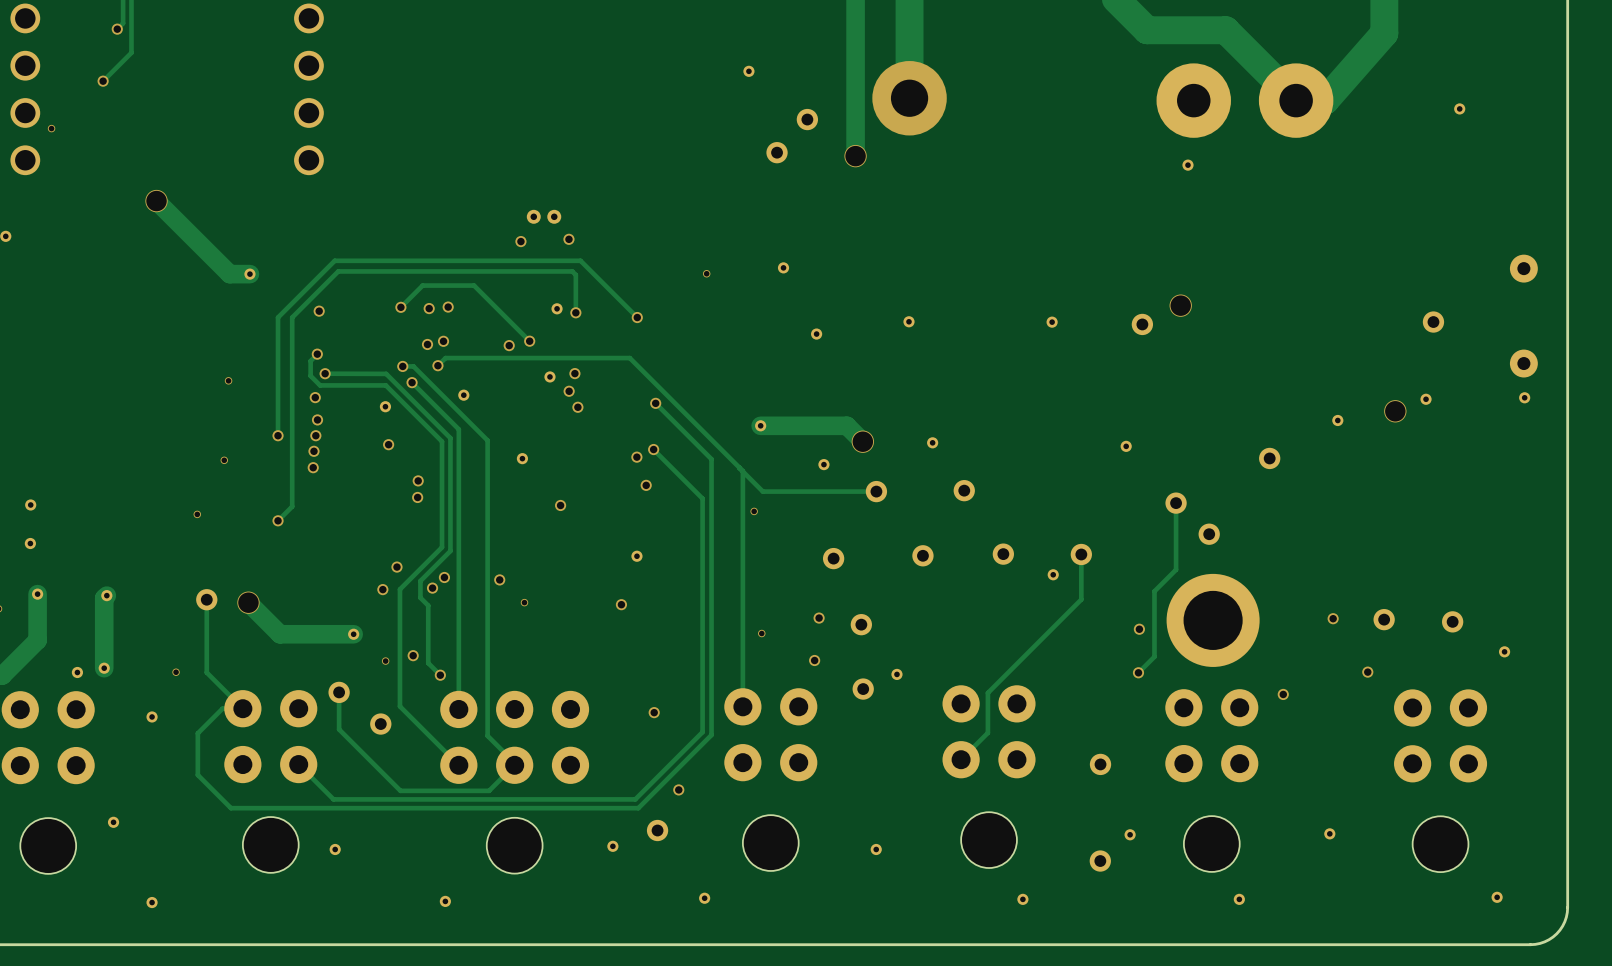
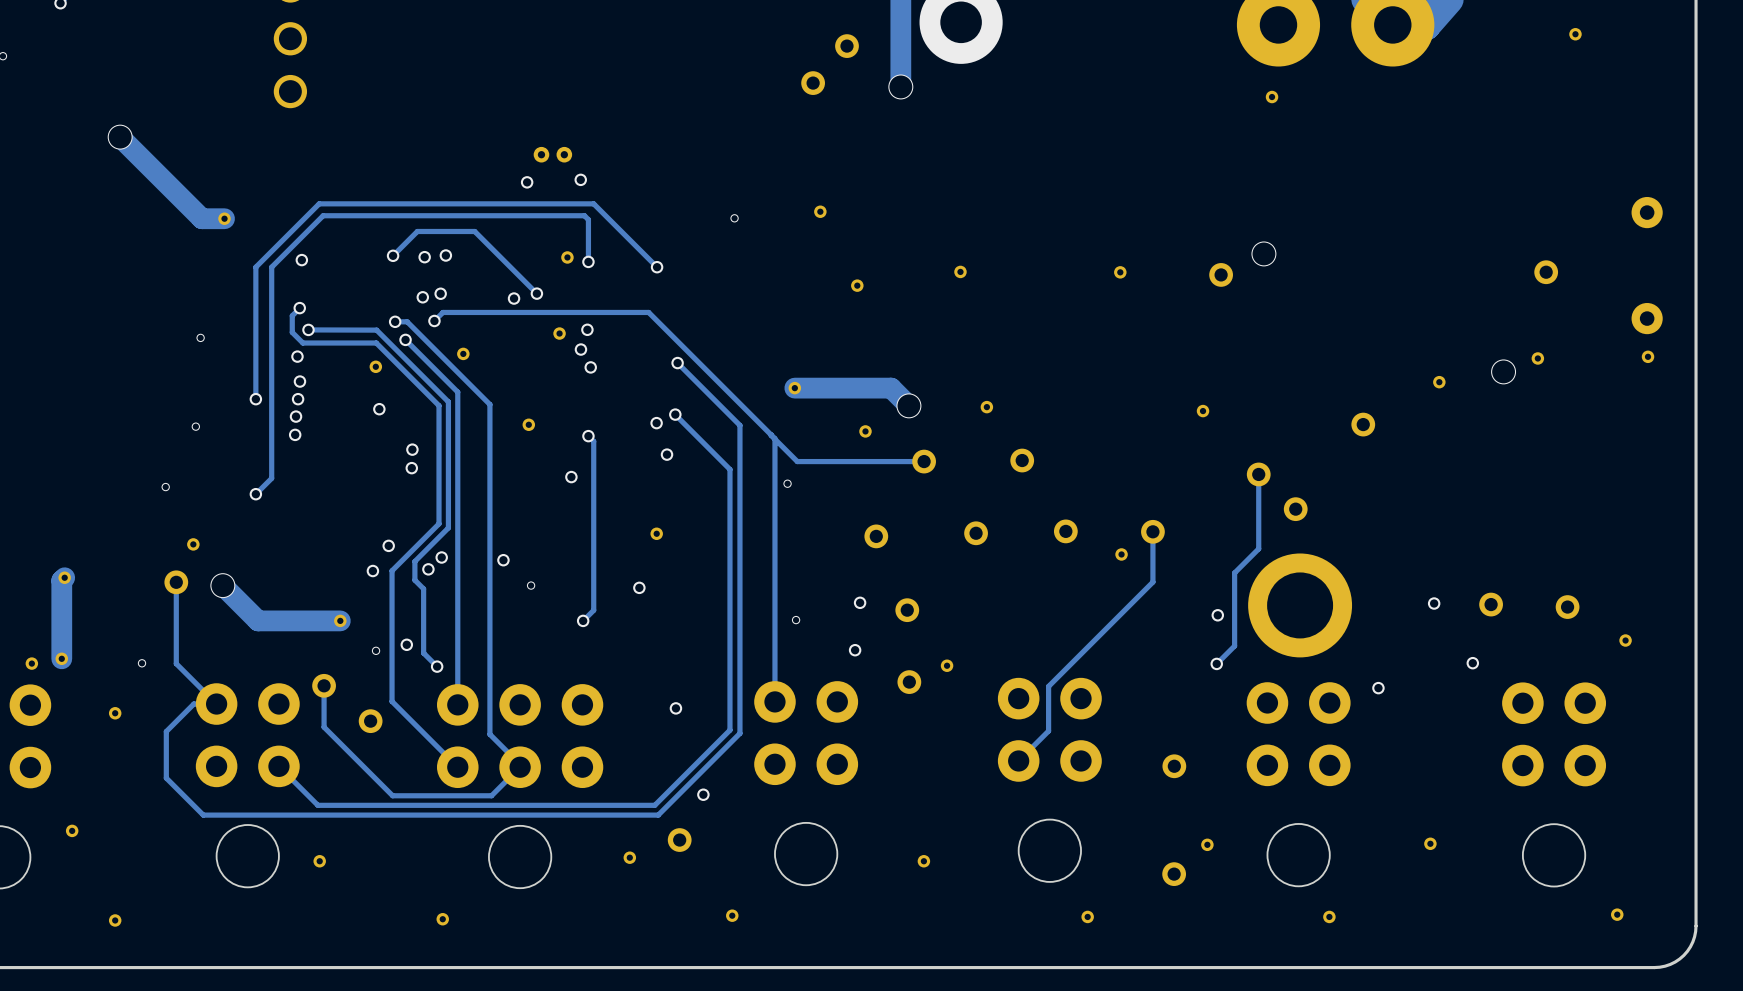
track: none -> (588, 436) (593, 441) (593, 610) (583, 620)
via: none -> (588, 436)
part: none -> (193, 544)
via: none -> (583, 620)

